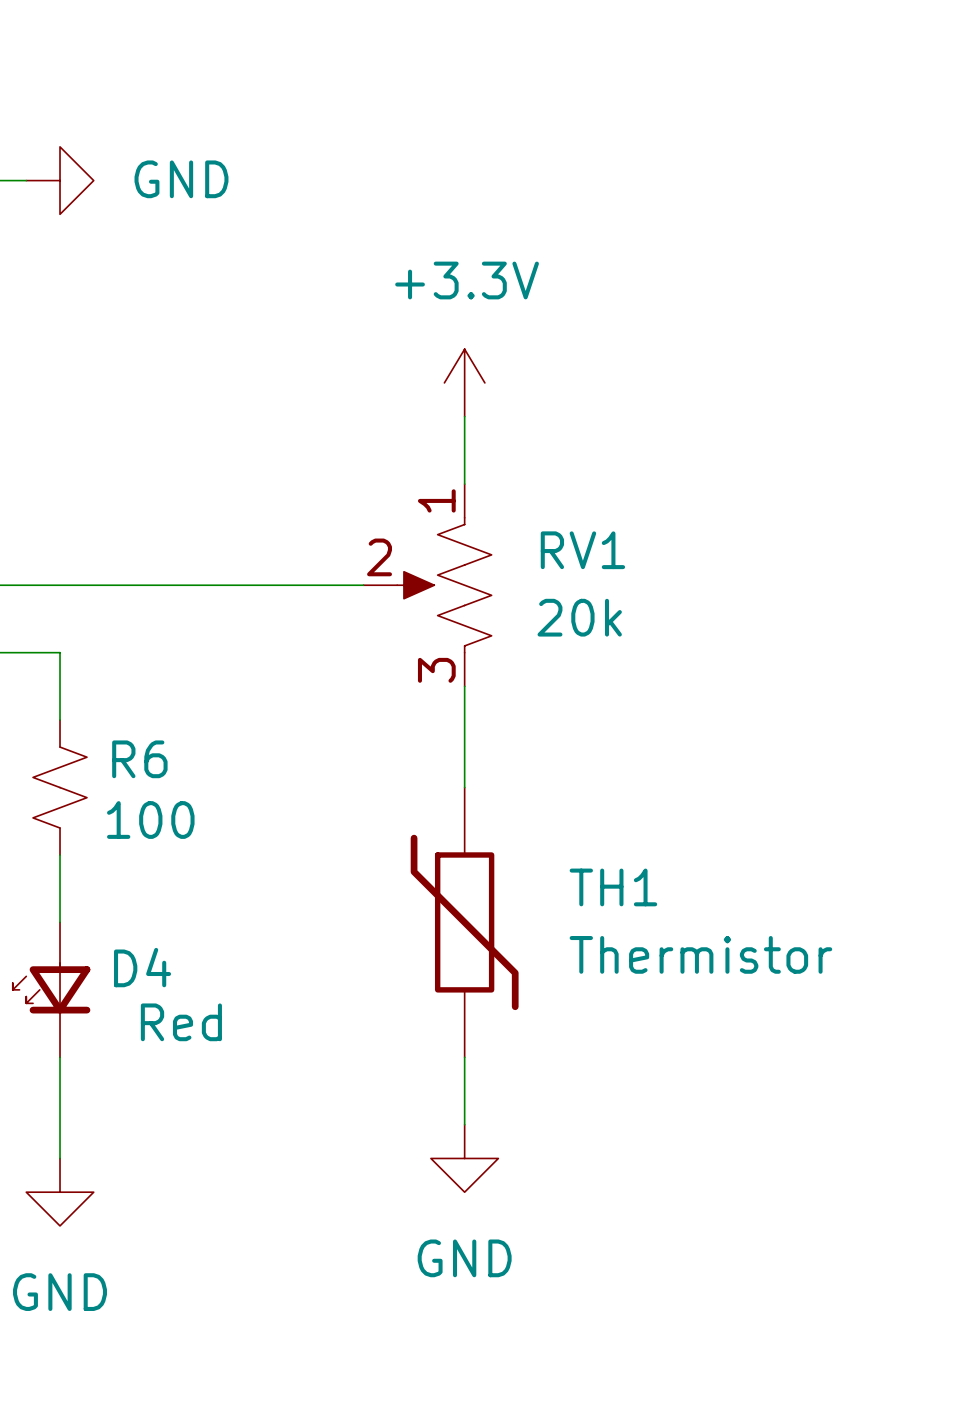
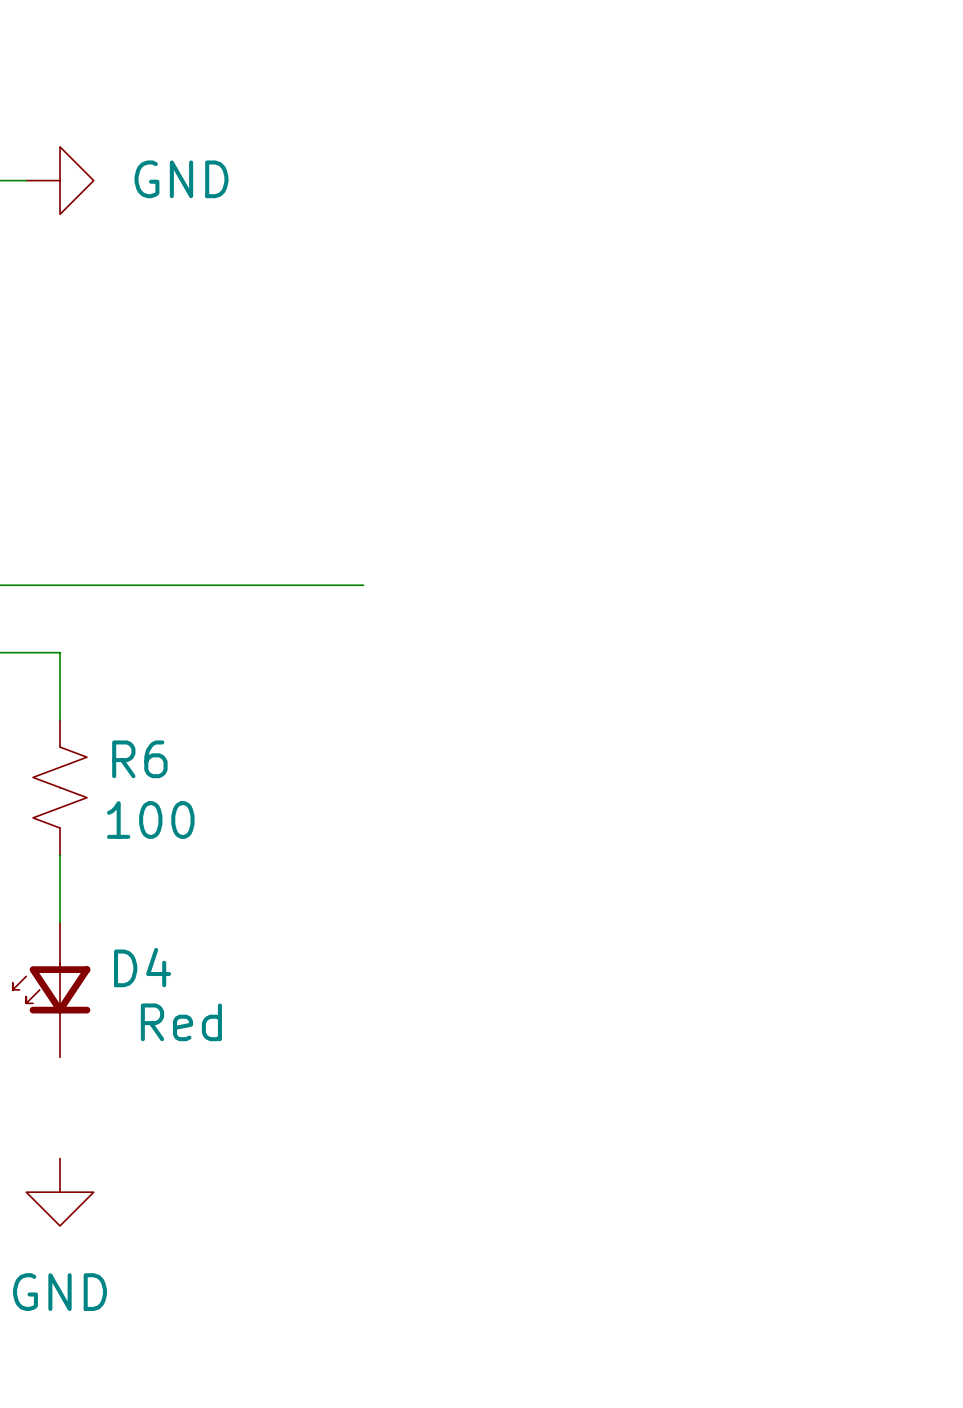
power symbol: +3.3V (464, 382) -> none
wire: (464, 416) (464, 484) -> none
RV1: 20k (427, 585) -> none
wire: (464, 686) (464, 787) -> none
TH1: Thermistor (464, 922) -> none
wire: (60, 1057) (60, 1158) -> none
wire: (464, 1057) (464, 1124) -> none
power symbol: GND (464, 1158) -> none

